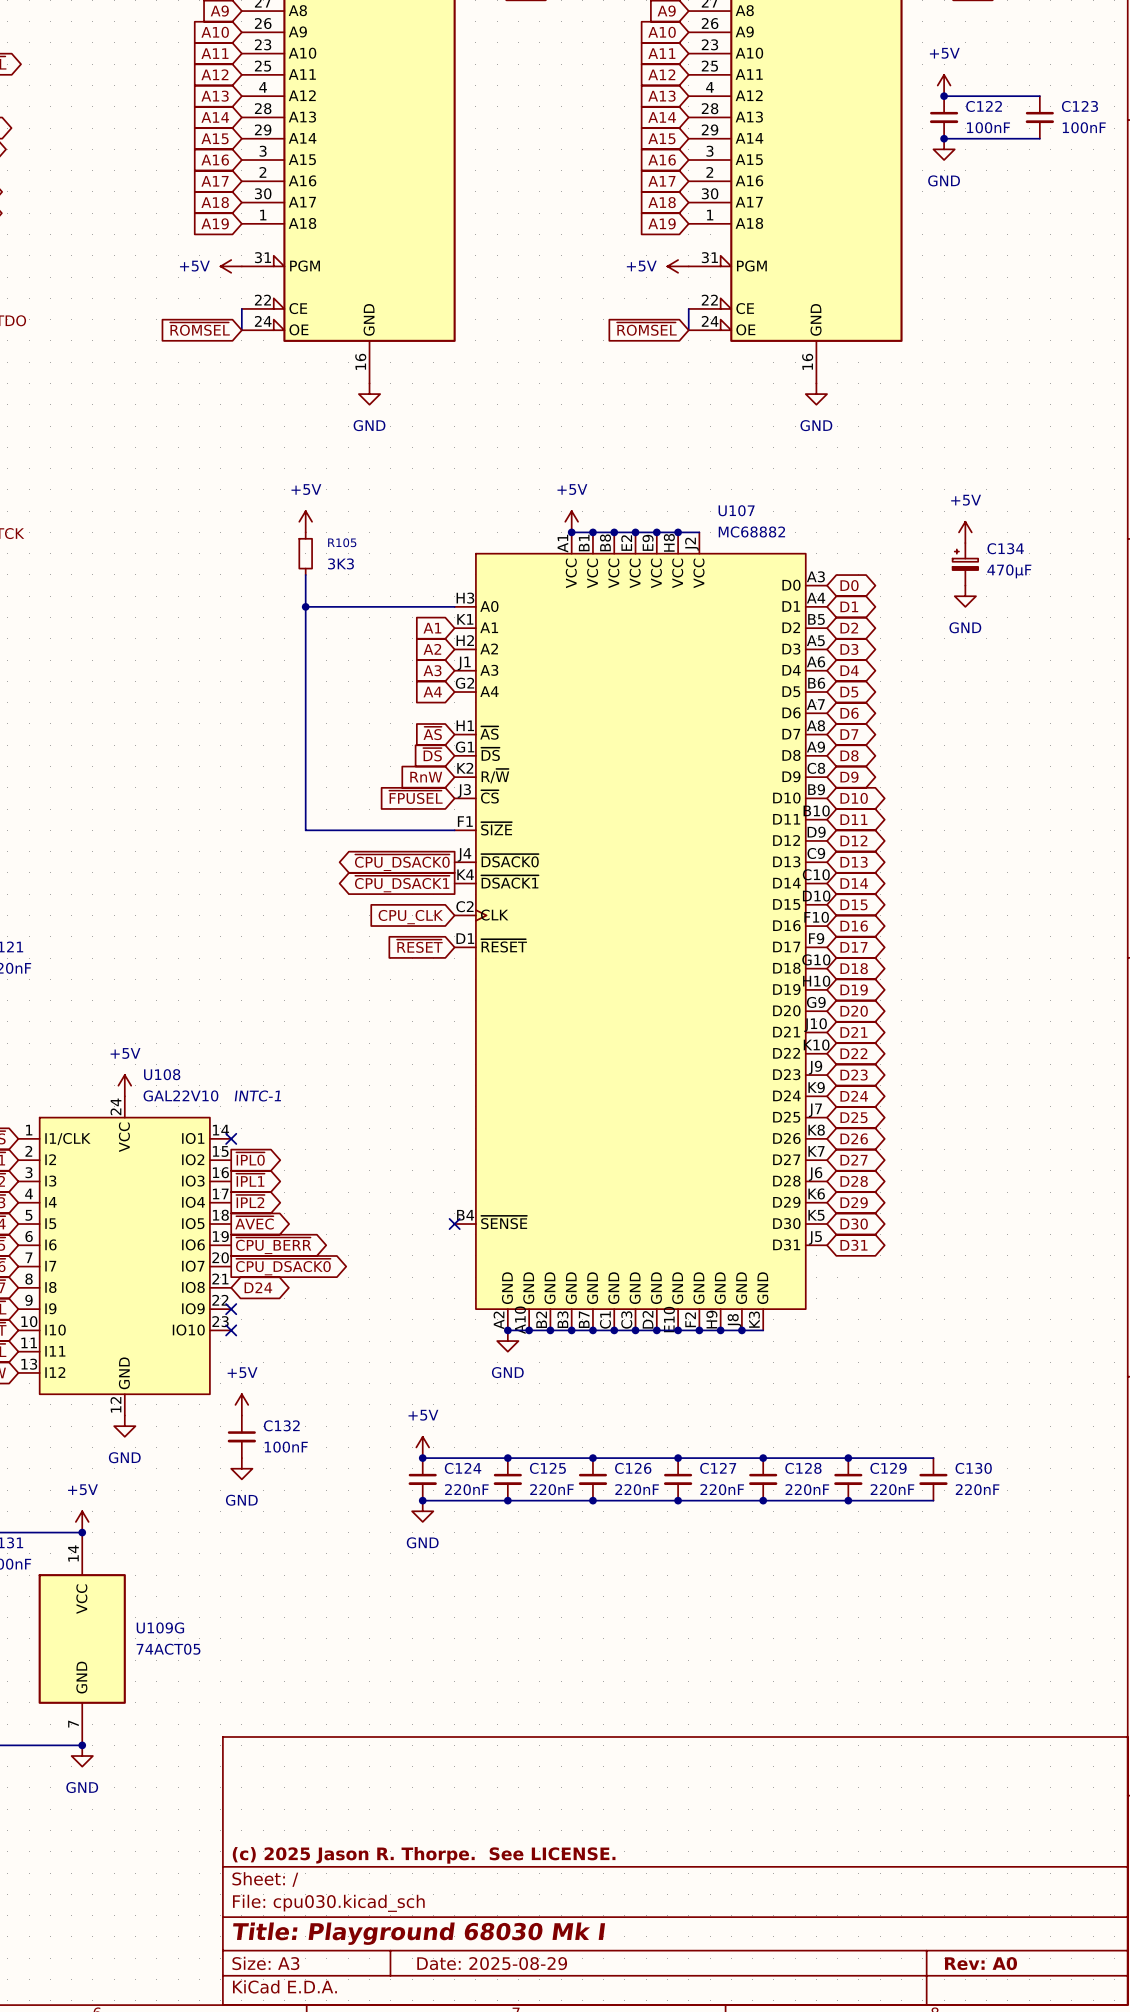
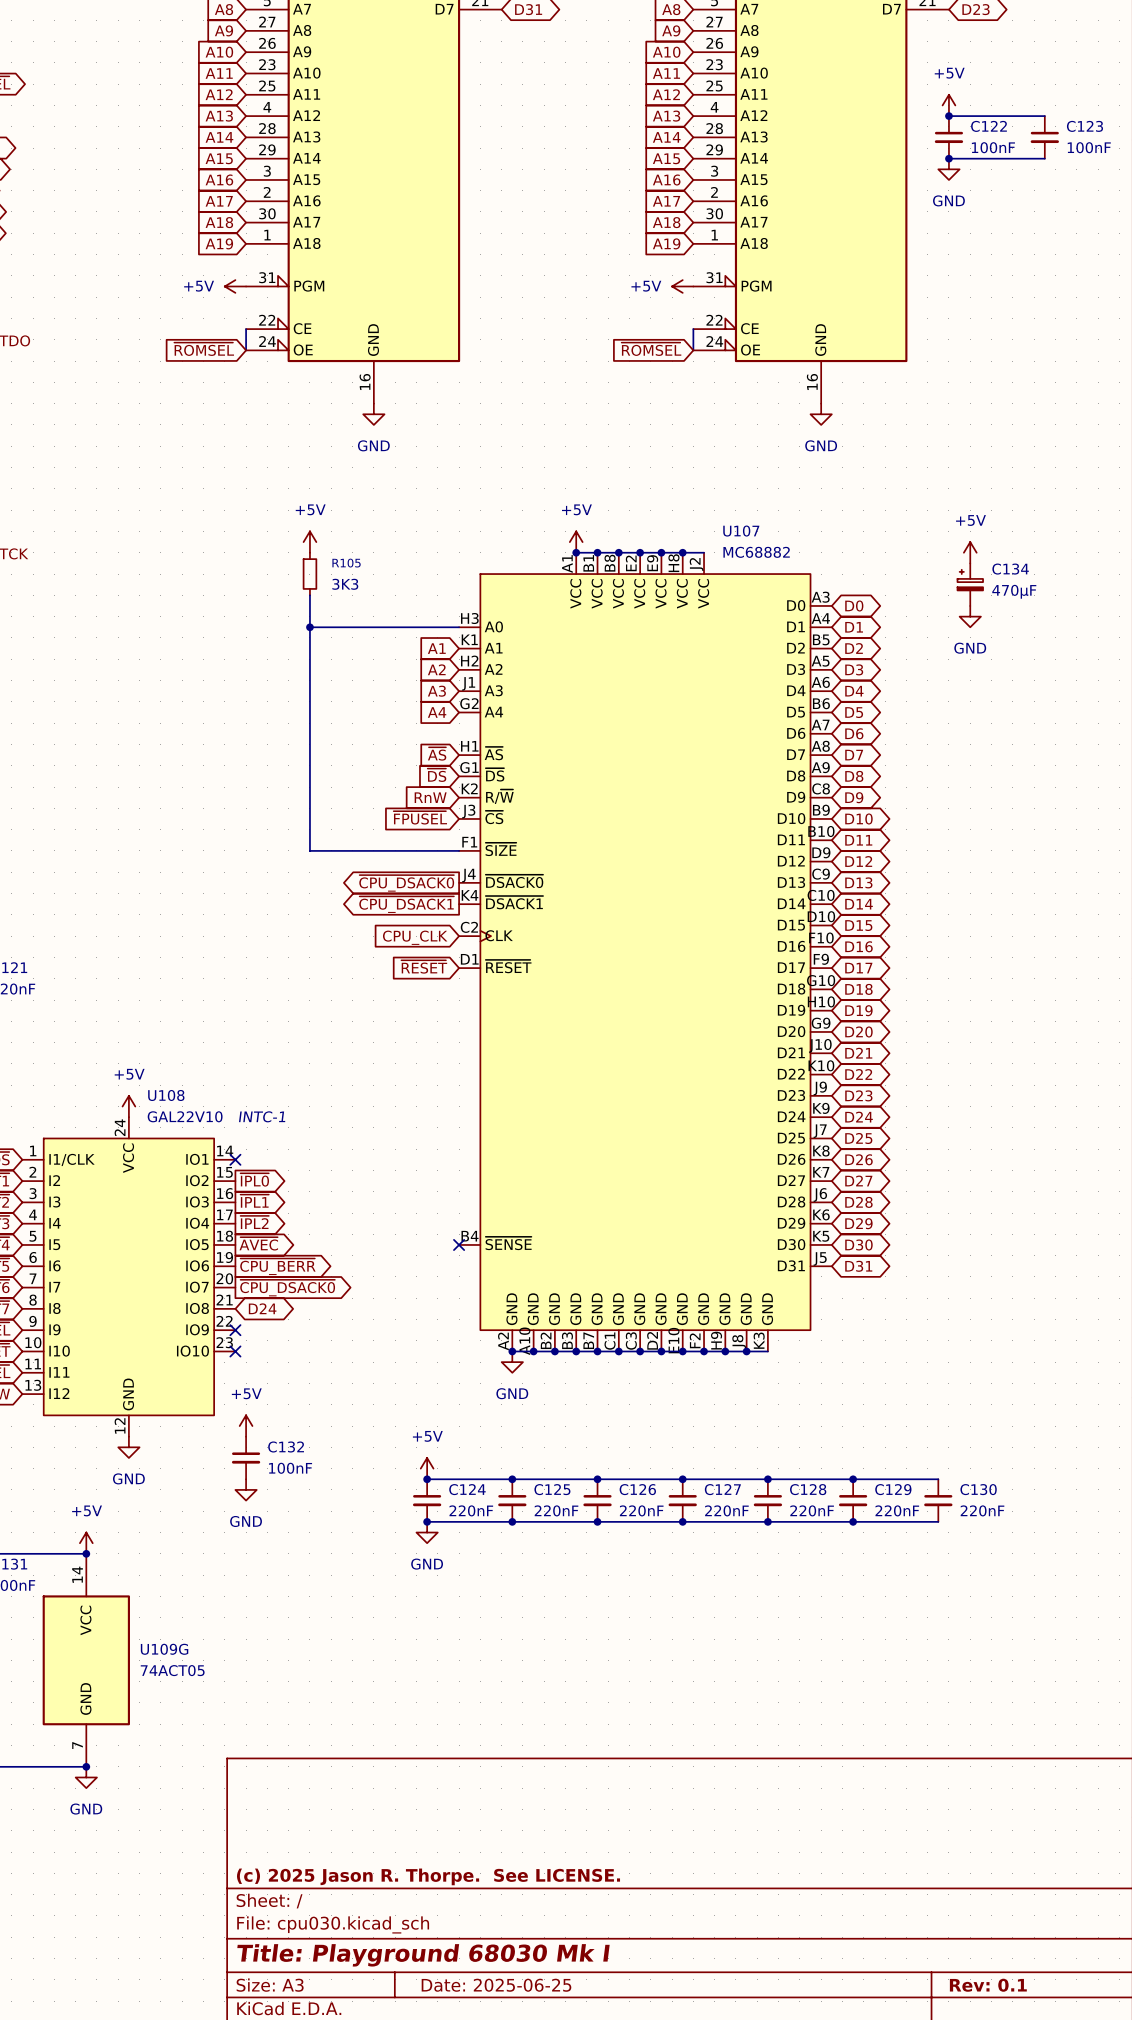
title block: Date: 2025-08-29 (492, 1963) -> Date: 2025-06-25 (496, 1985)
title block: Rev: A0 (981, 1963) -> Rev: 0.1 (988, 1985)

